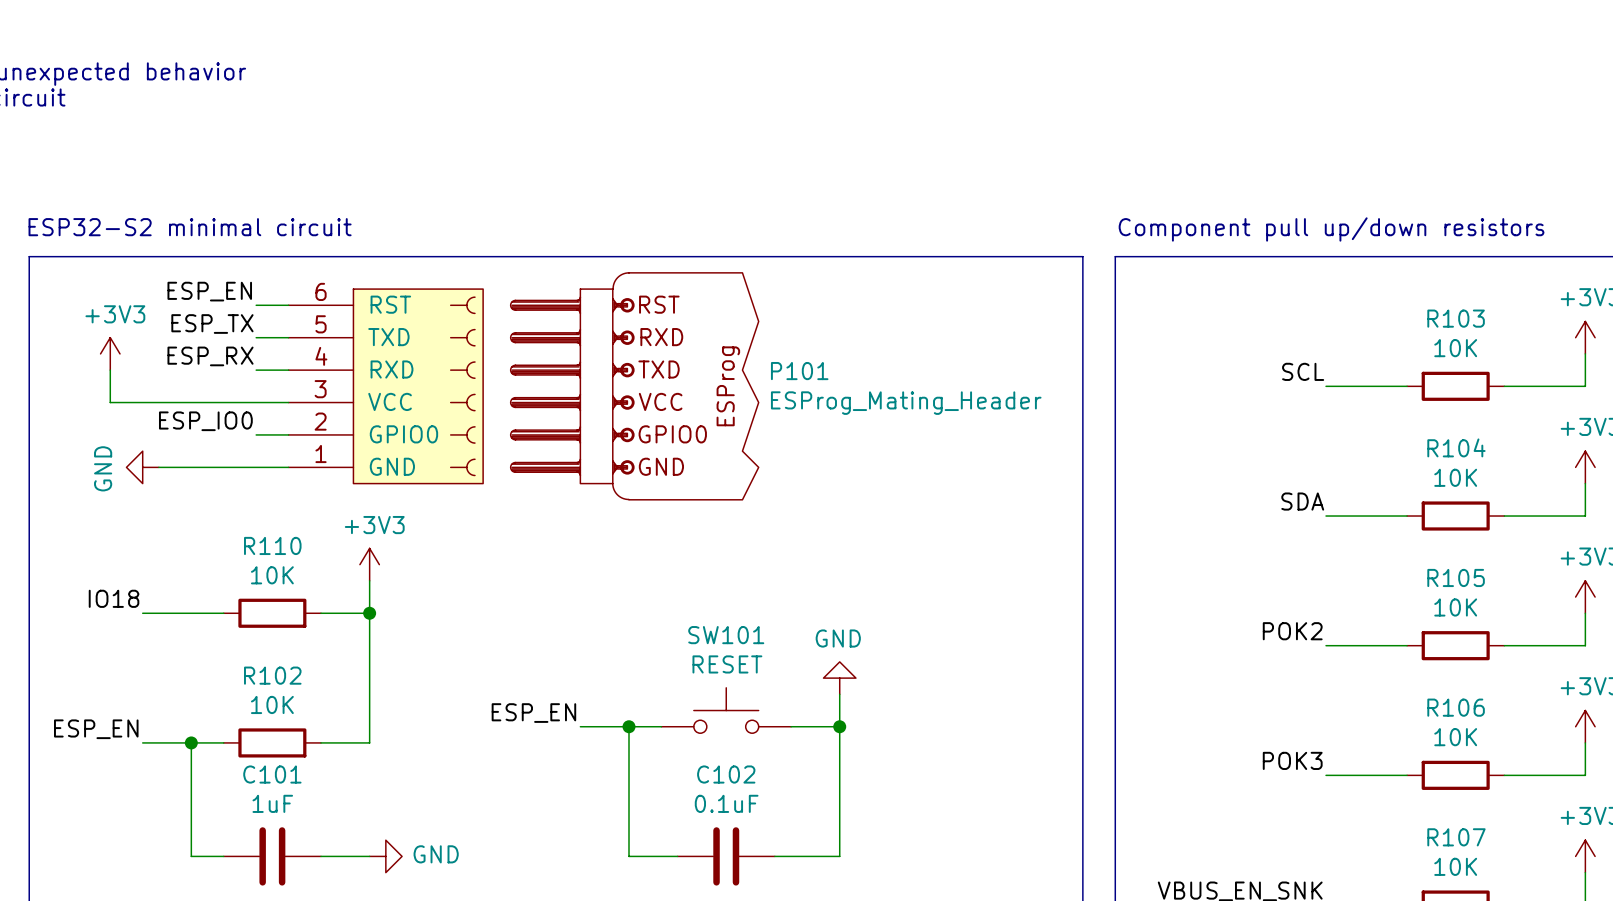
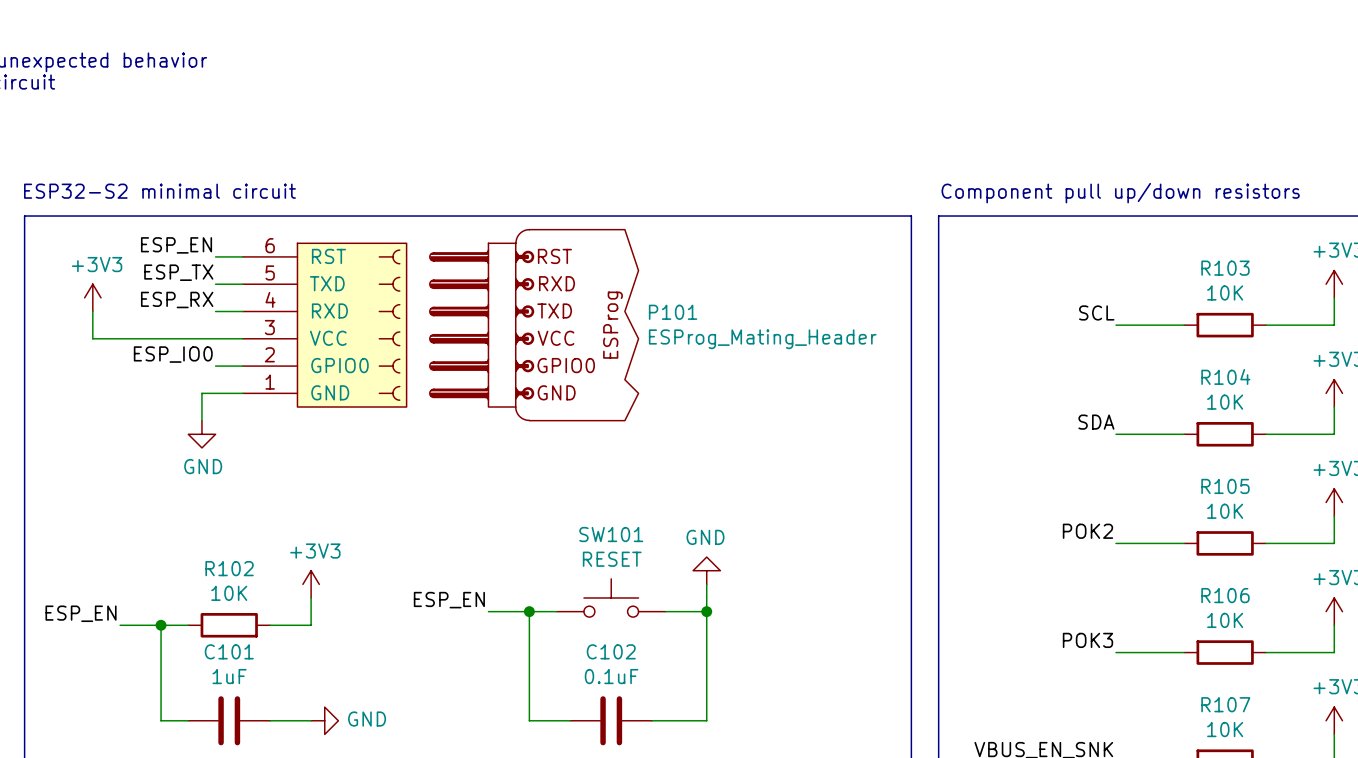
power symbol rotation: 0° (142, 467) -> 90° counterclockwise (201, 434)
power symbol position: GND (142, 467) -> GND (201, 434)
wire: (158, 467) (239, 467) -> (201, 420) (201, 393)
power symbol position: +3V3 (369, 564) -> +3V3 (311, 584)
wire: (369, 580) (369, 710) -> none
label: IO18 (114, 598) -> none
wire: (142, 613) (223, 613) -> none
R110: 10K (272, 613) -> none
wire: (321, 613) (369, 613) -> none
junction: (369, 613) -> none

